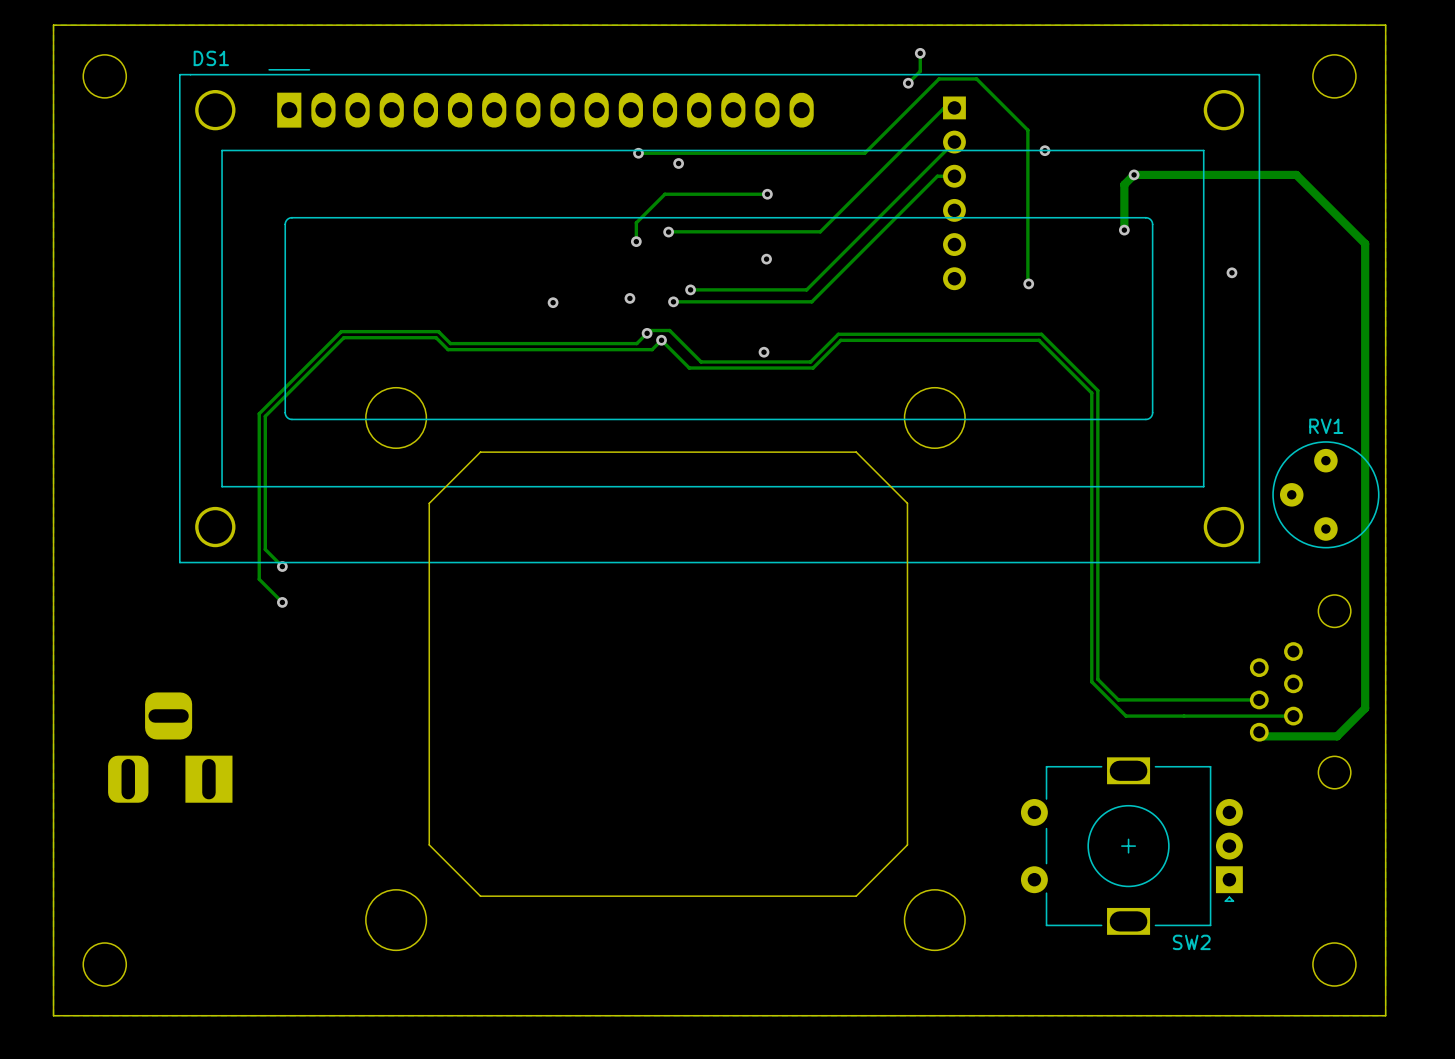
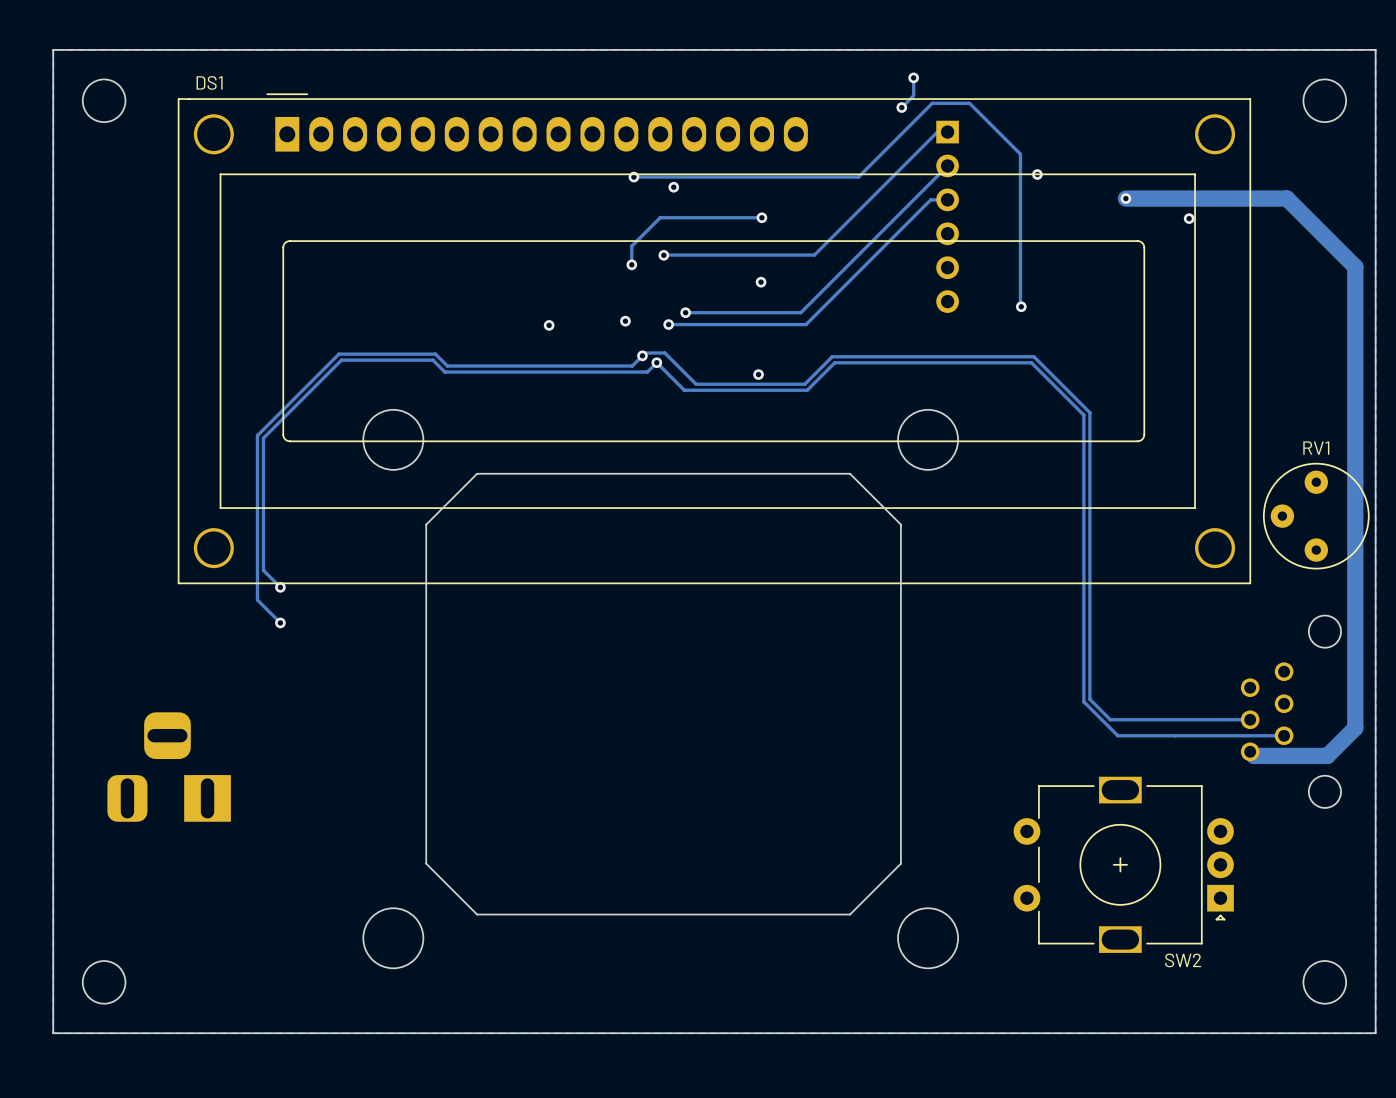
track: (1134, 174) (1124, 184) (1124, 230) -> none
track width: thin (1134, 174) (1296, 174) (1365, 243) (1365, 708) (1337, 736) (1263, 736) (1259, 732) -> thick (1125, 198) (1286, 198) (1355, 266) (1355, 728) (1327, 755) (1254, 755) (1250, 751)
via: none -> (1189, 218)
via: (1124, 230) -> none
via: (1231, 272) -> none

